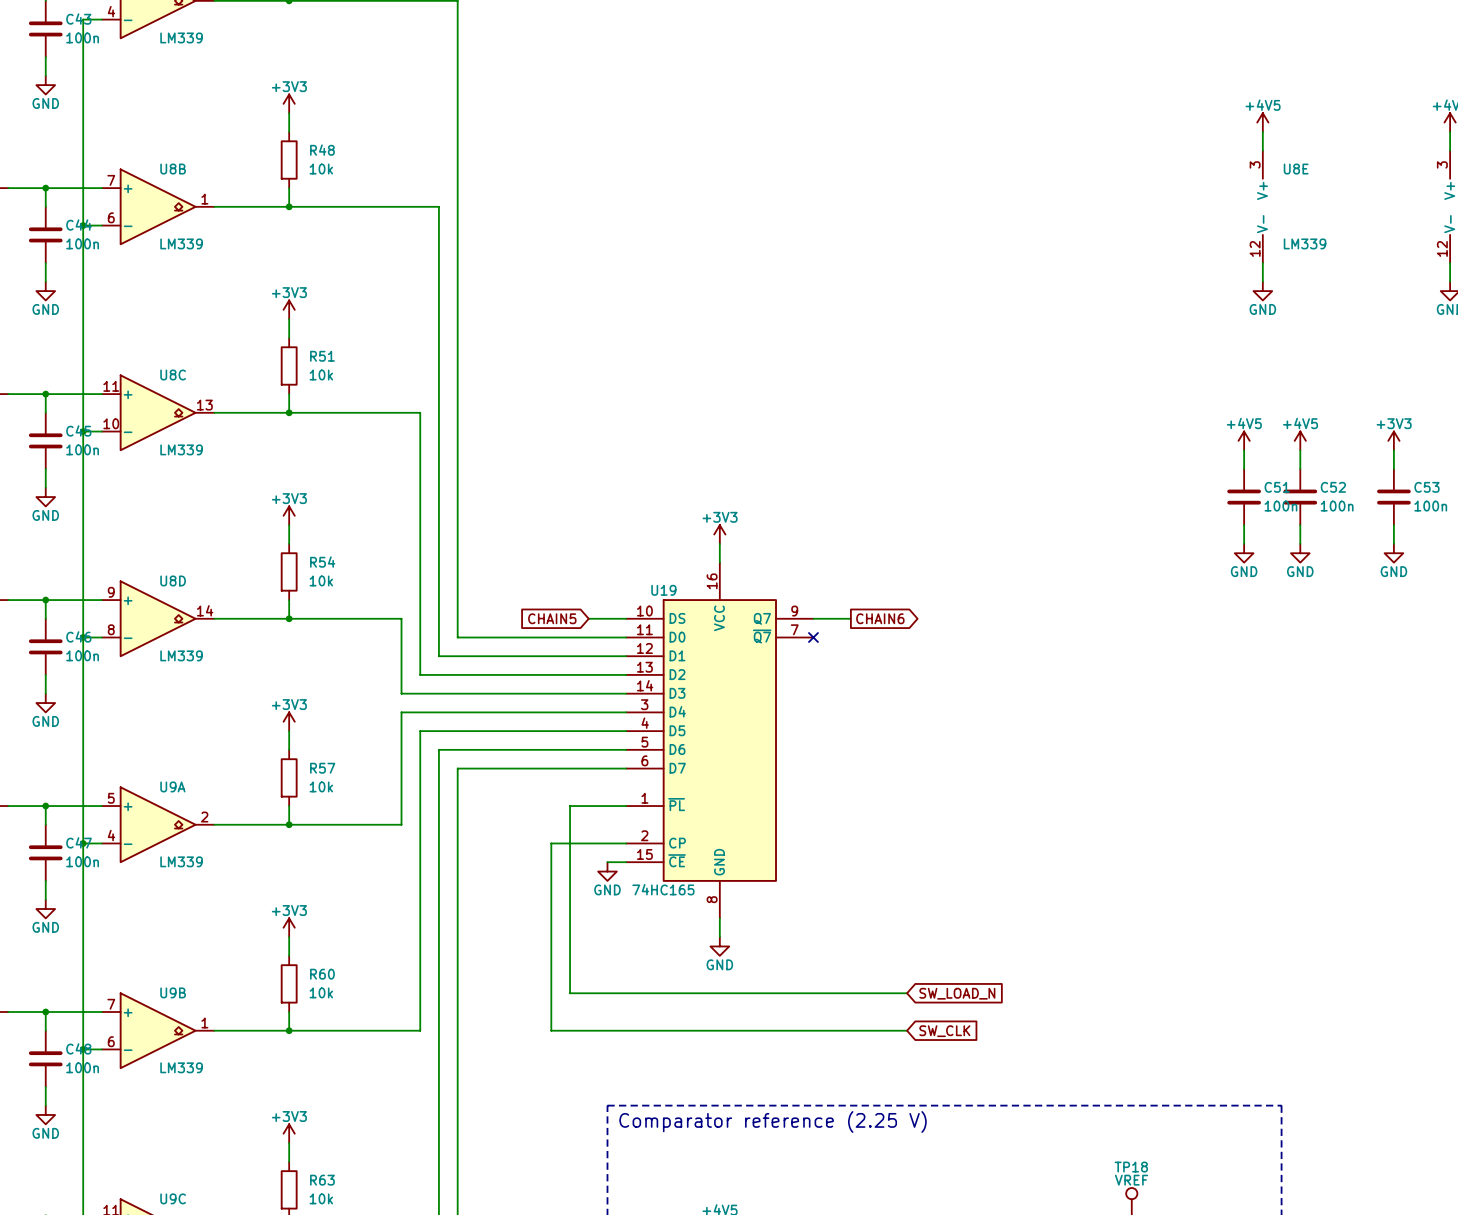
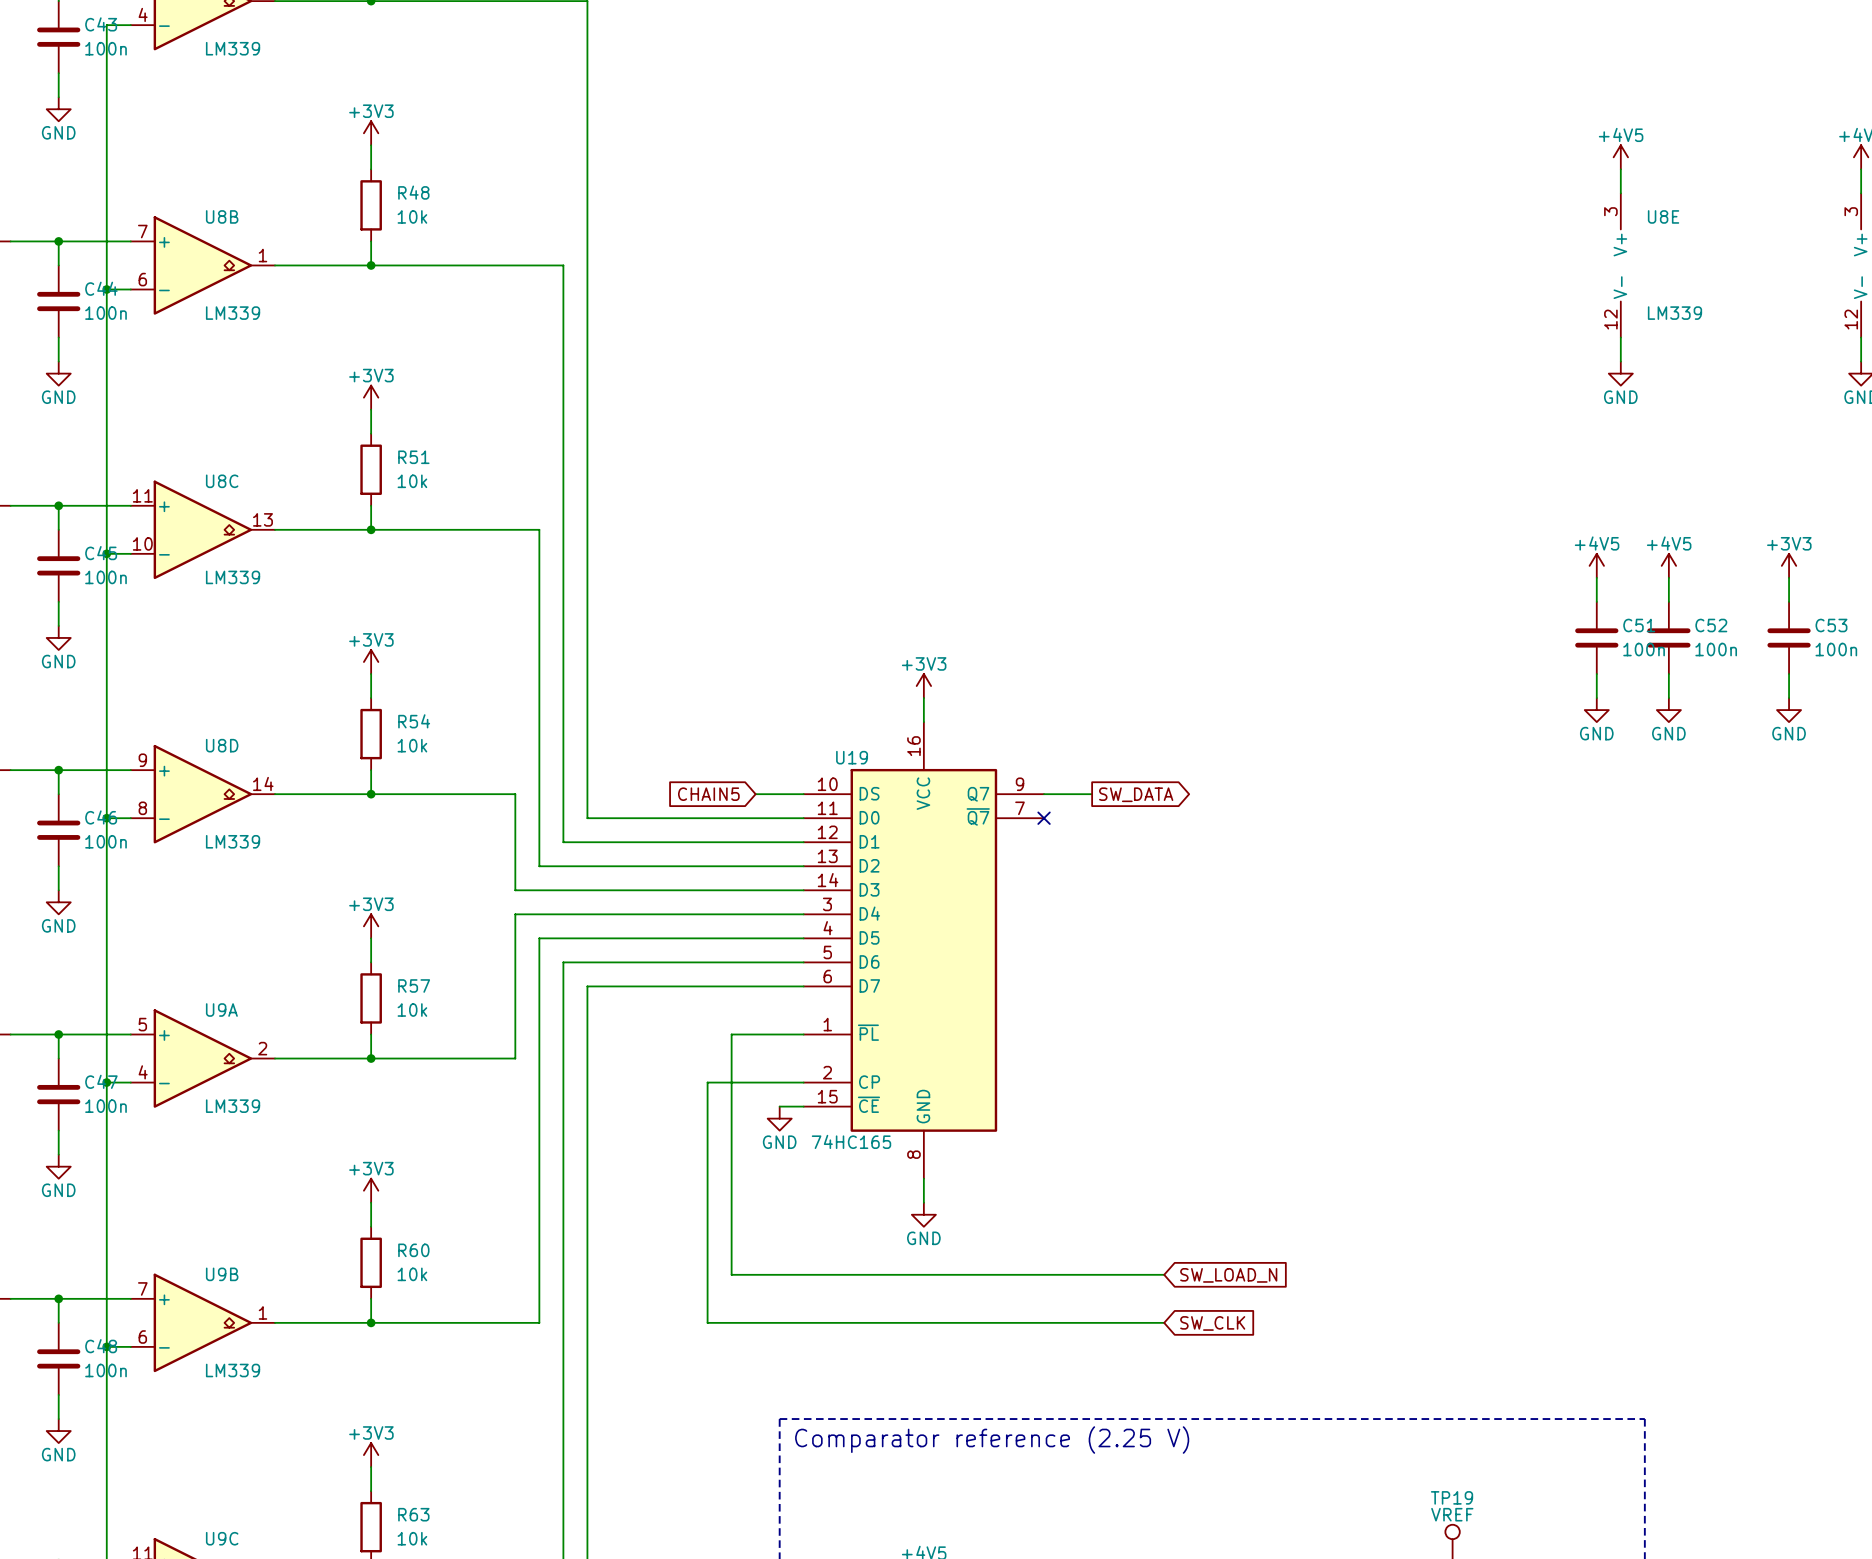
global label: CHAIN6 (880, 618) -> SW_DATA (1136, 794)
TP18 name: TP18 (1131, 1167) -> TP19 (1452, 1497)

